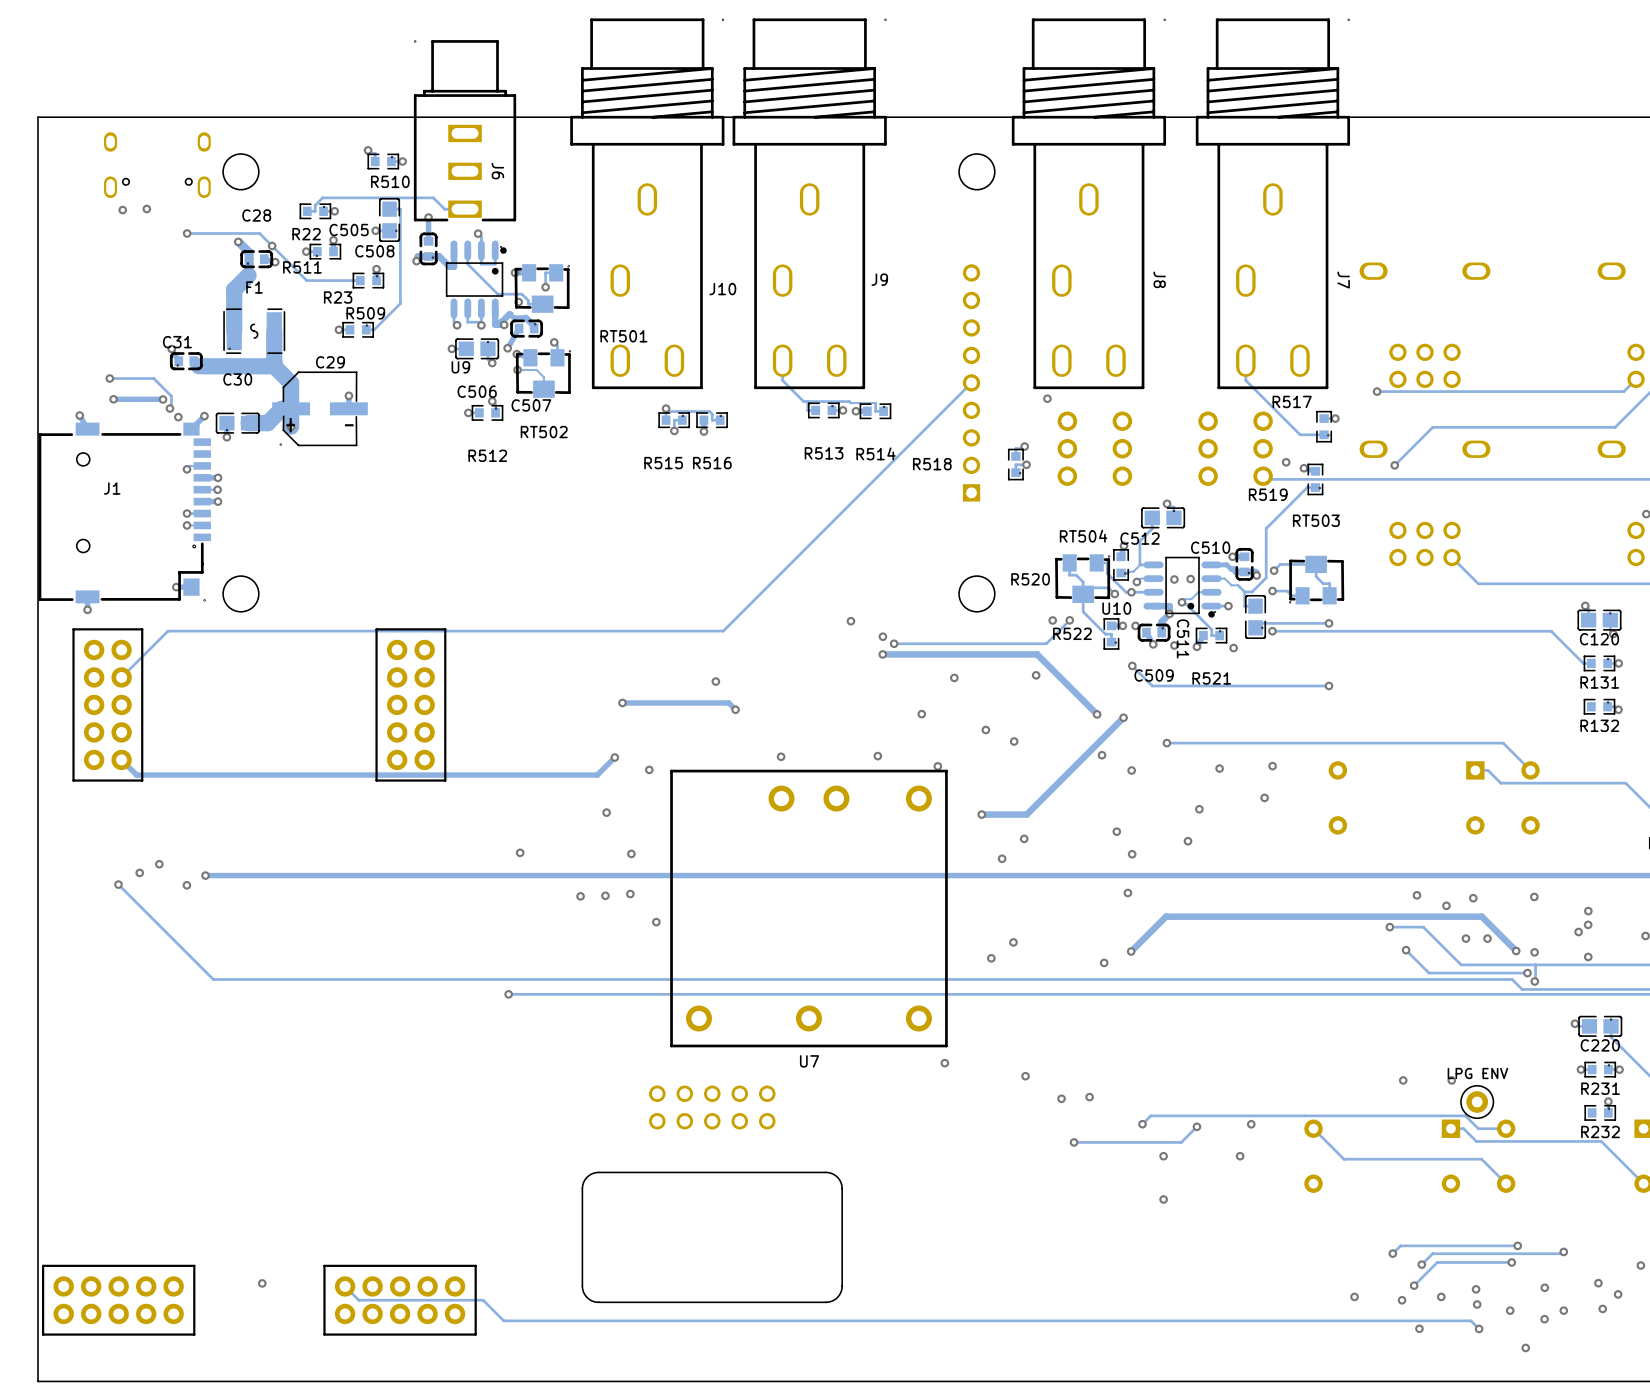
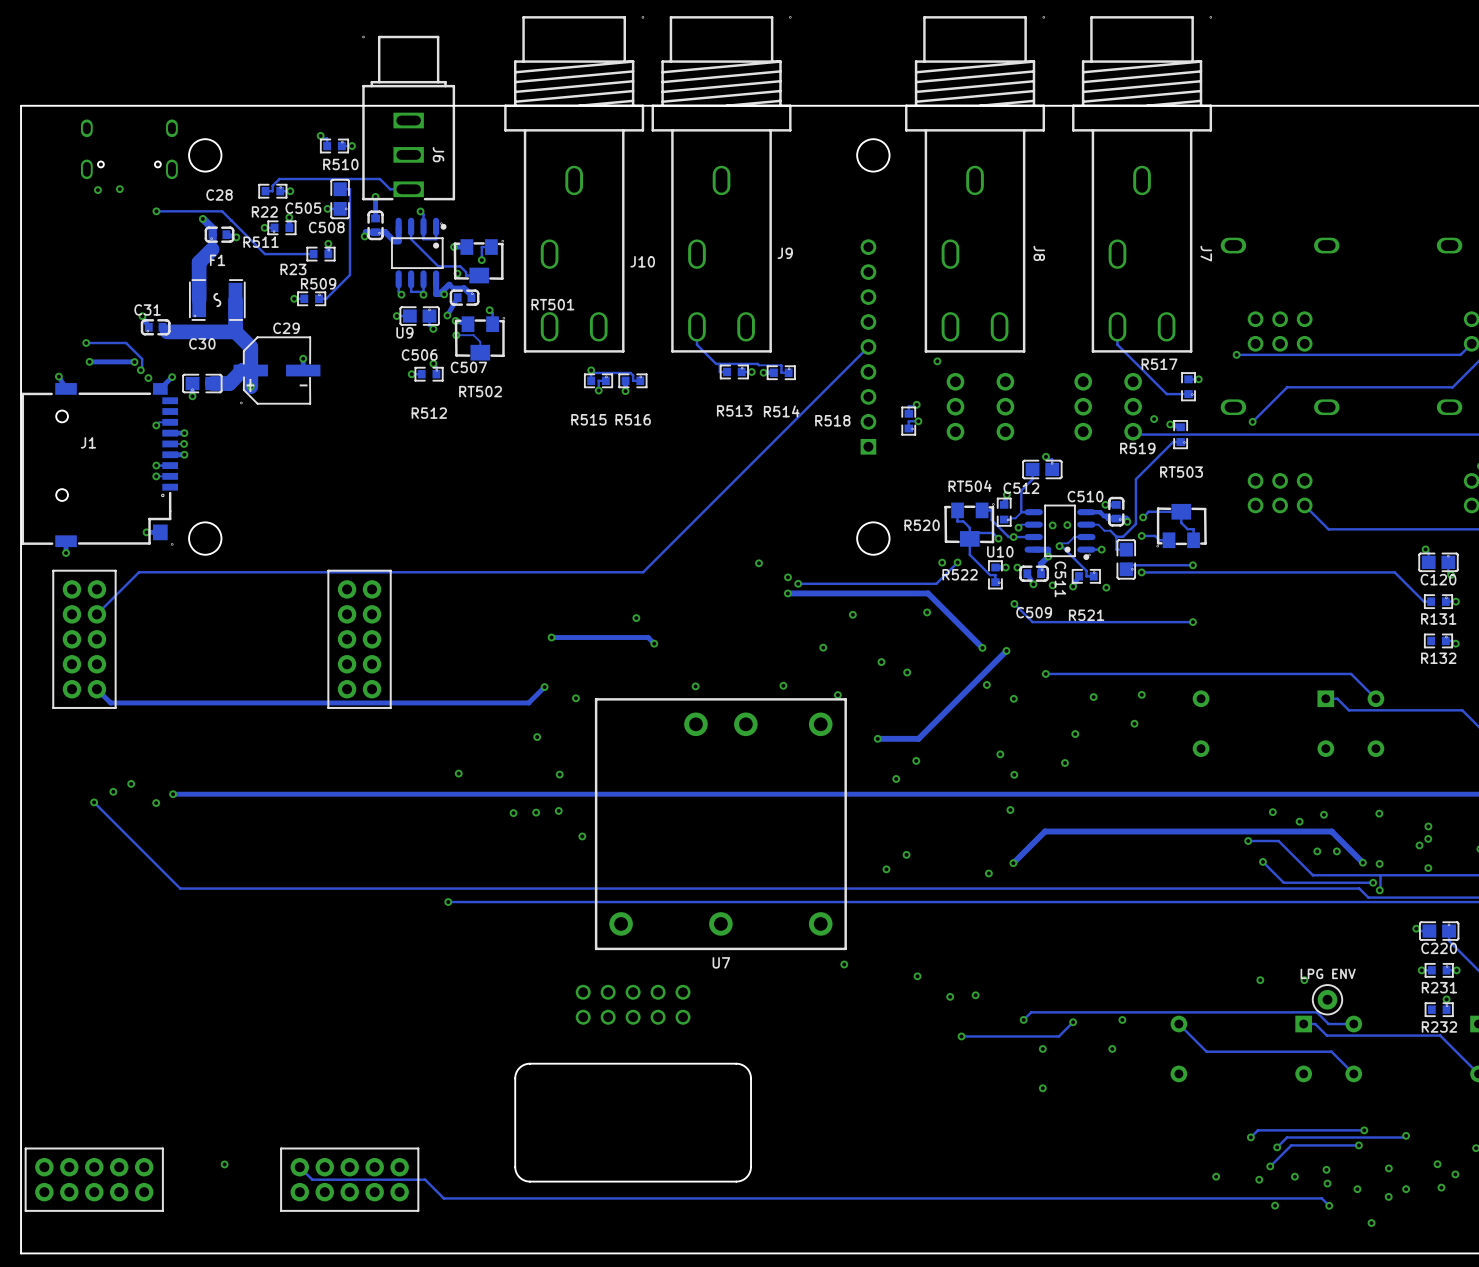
via: (272, 245) -> none

